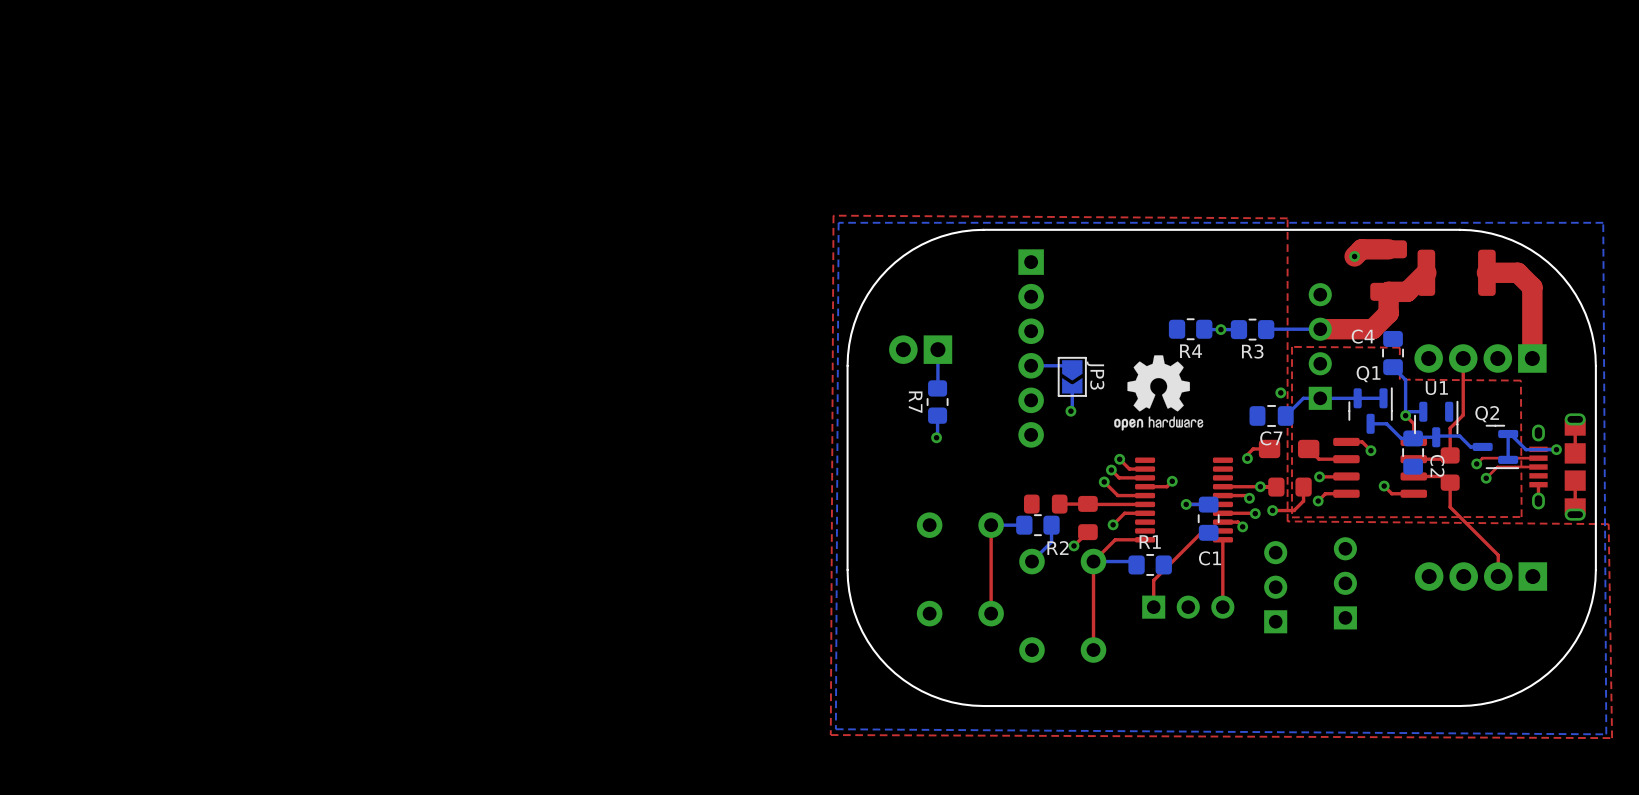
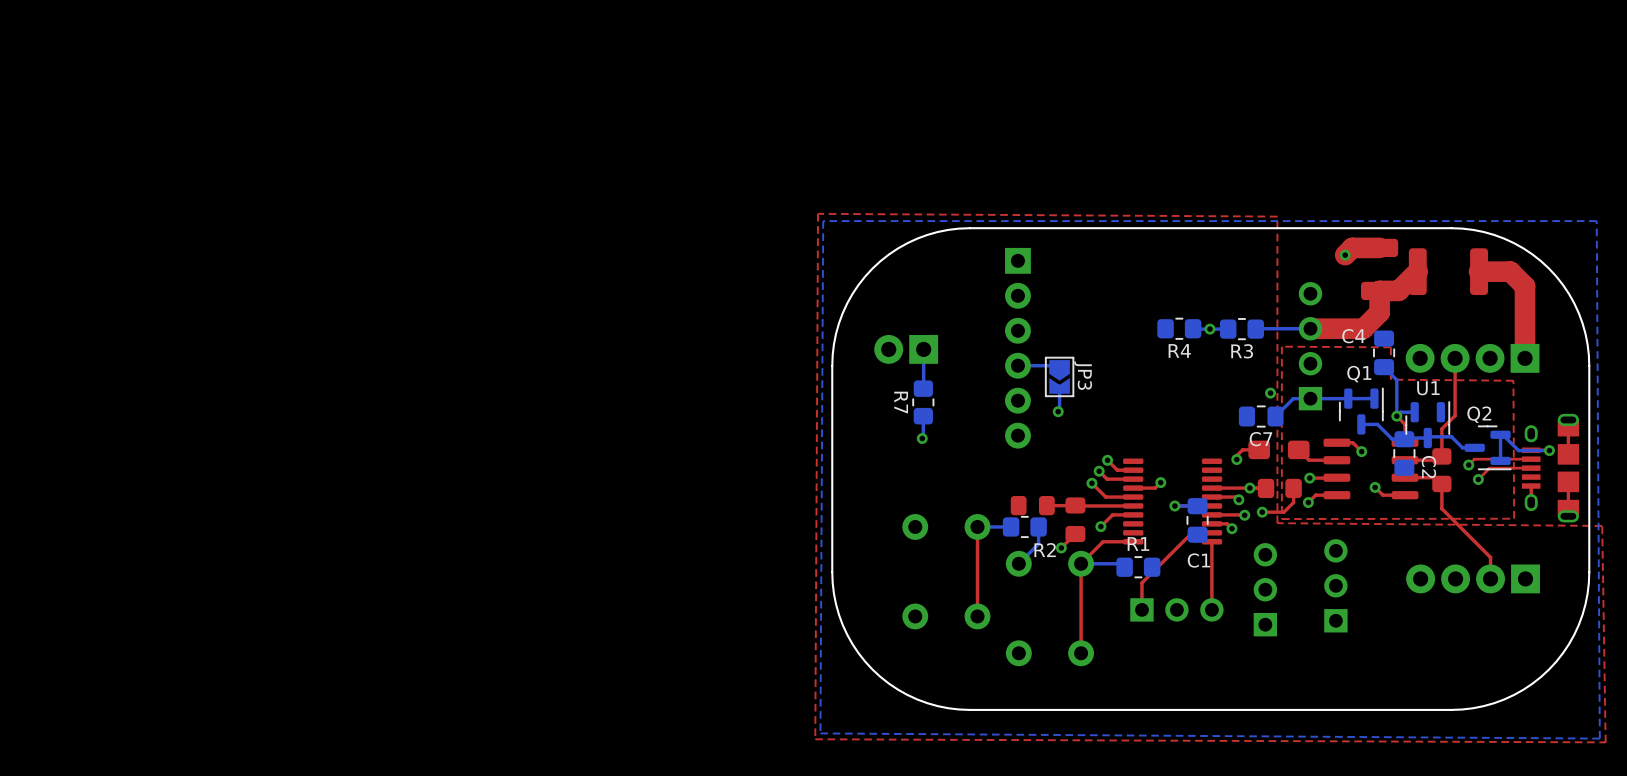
drawing: [1114, 355, 1204, 431] -> none

